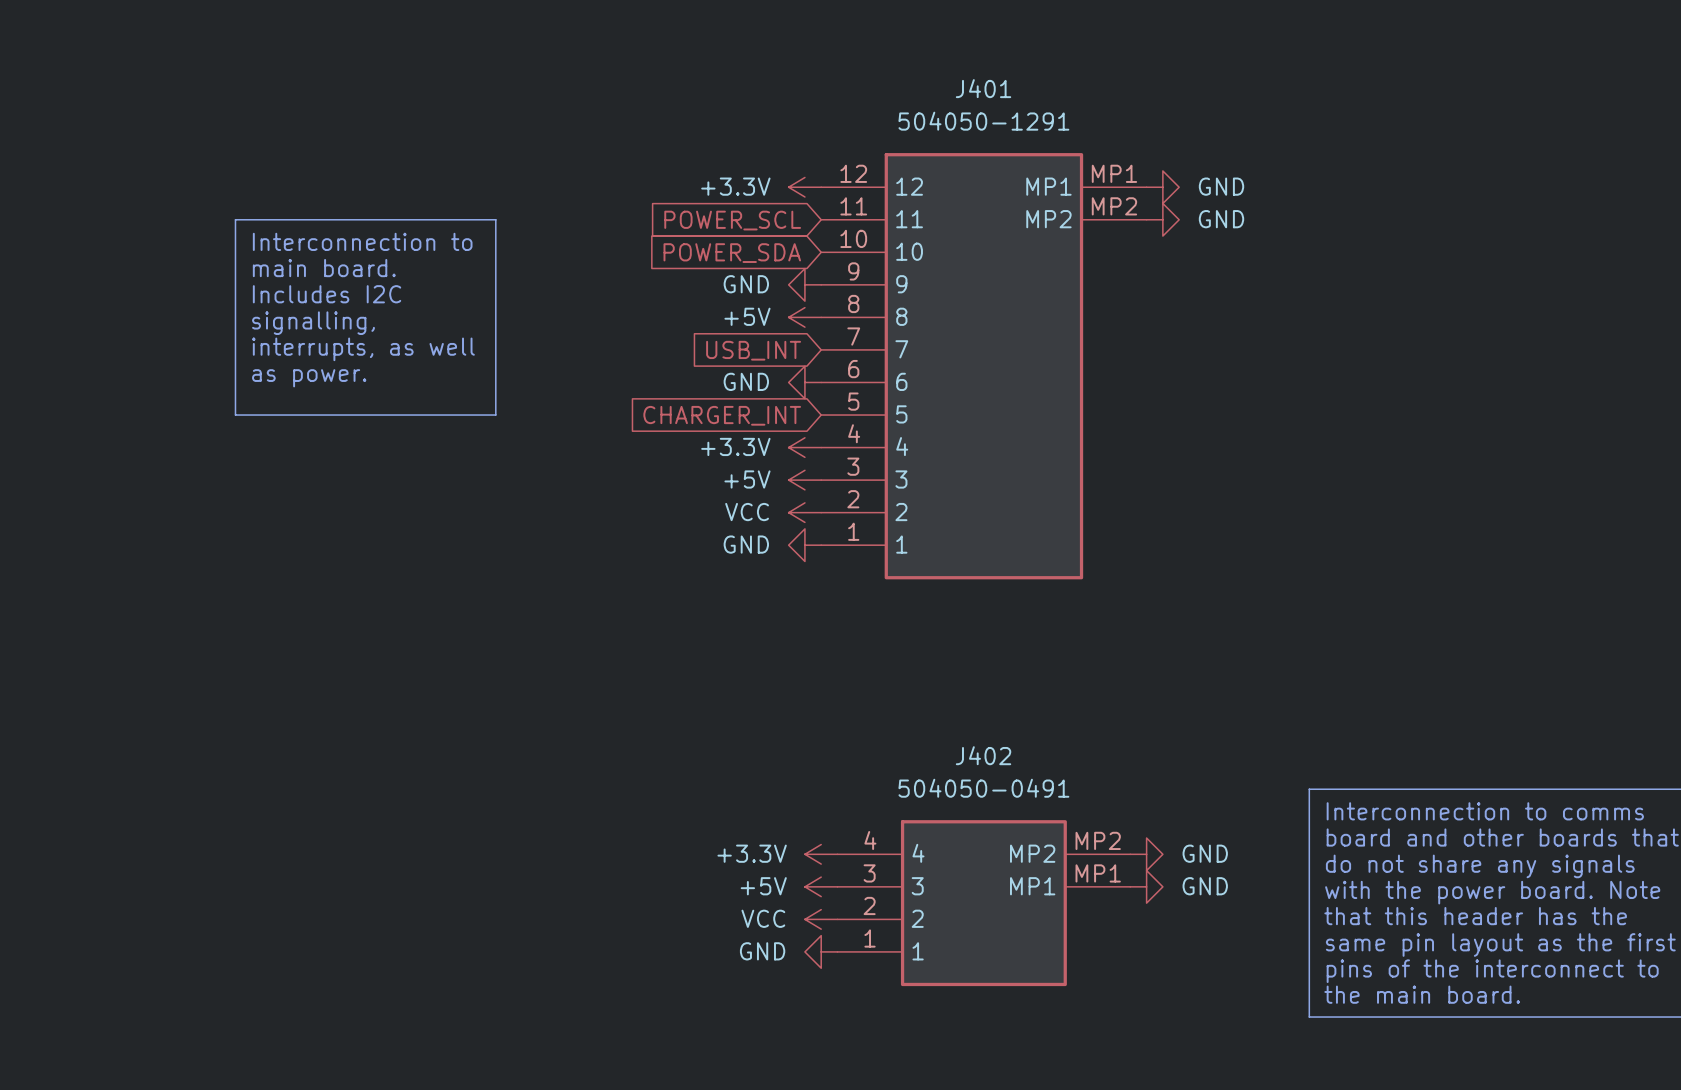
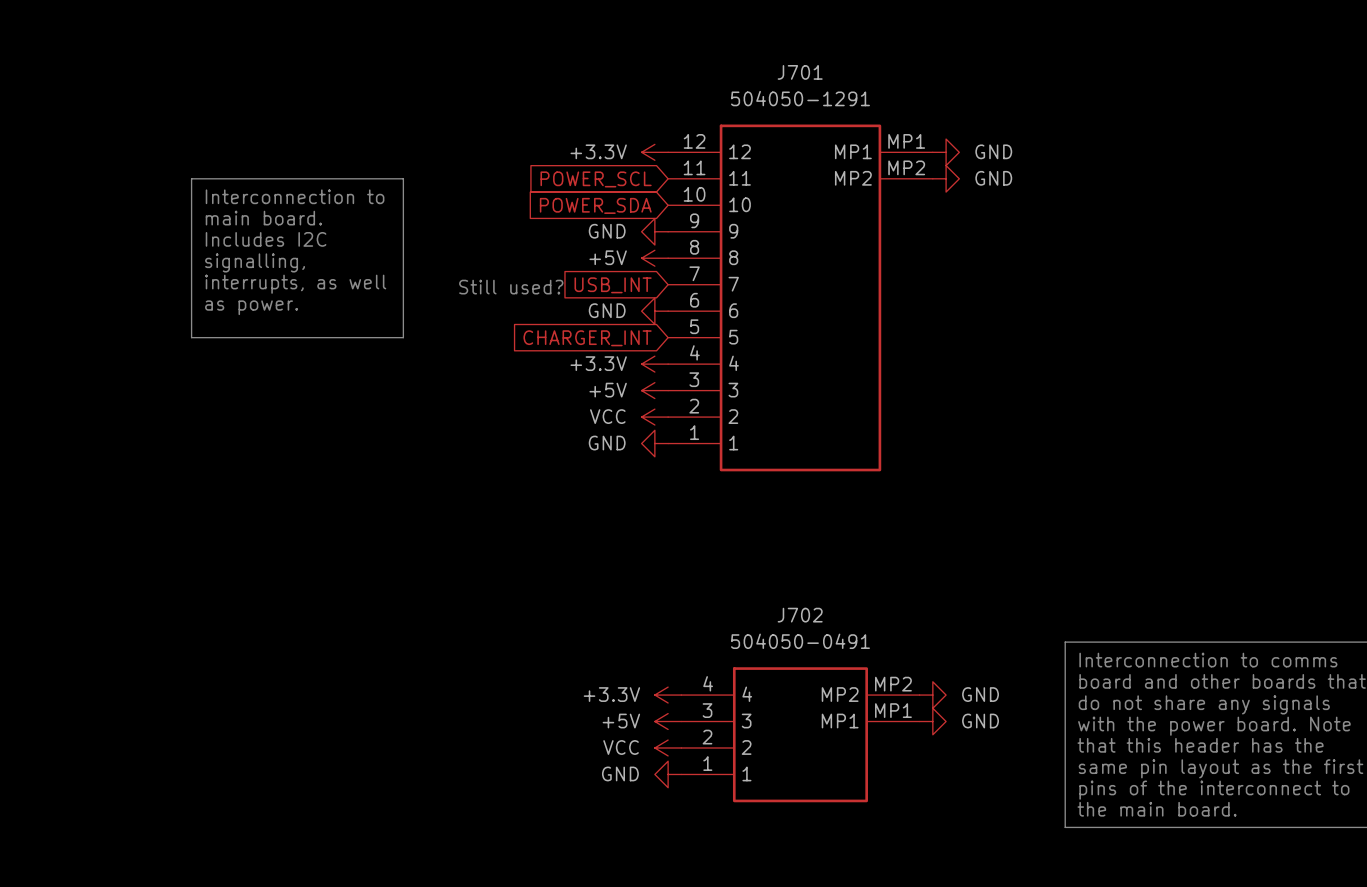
J401 name: J401 (983, 88) -> J701 (800, 72)
text: none -> Still used? (511, 287)
J402 name: J402 (983, 755) -> J702 (800, 615)

